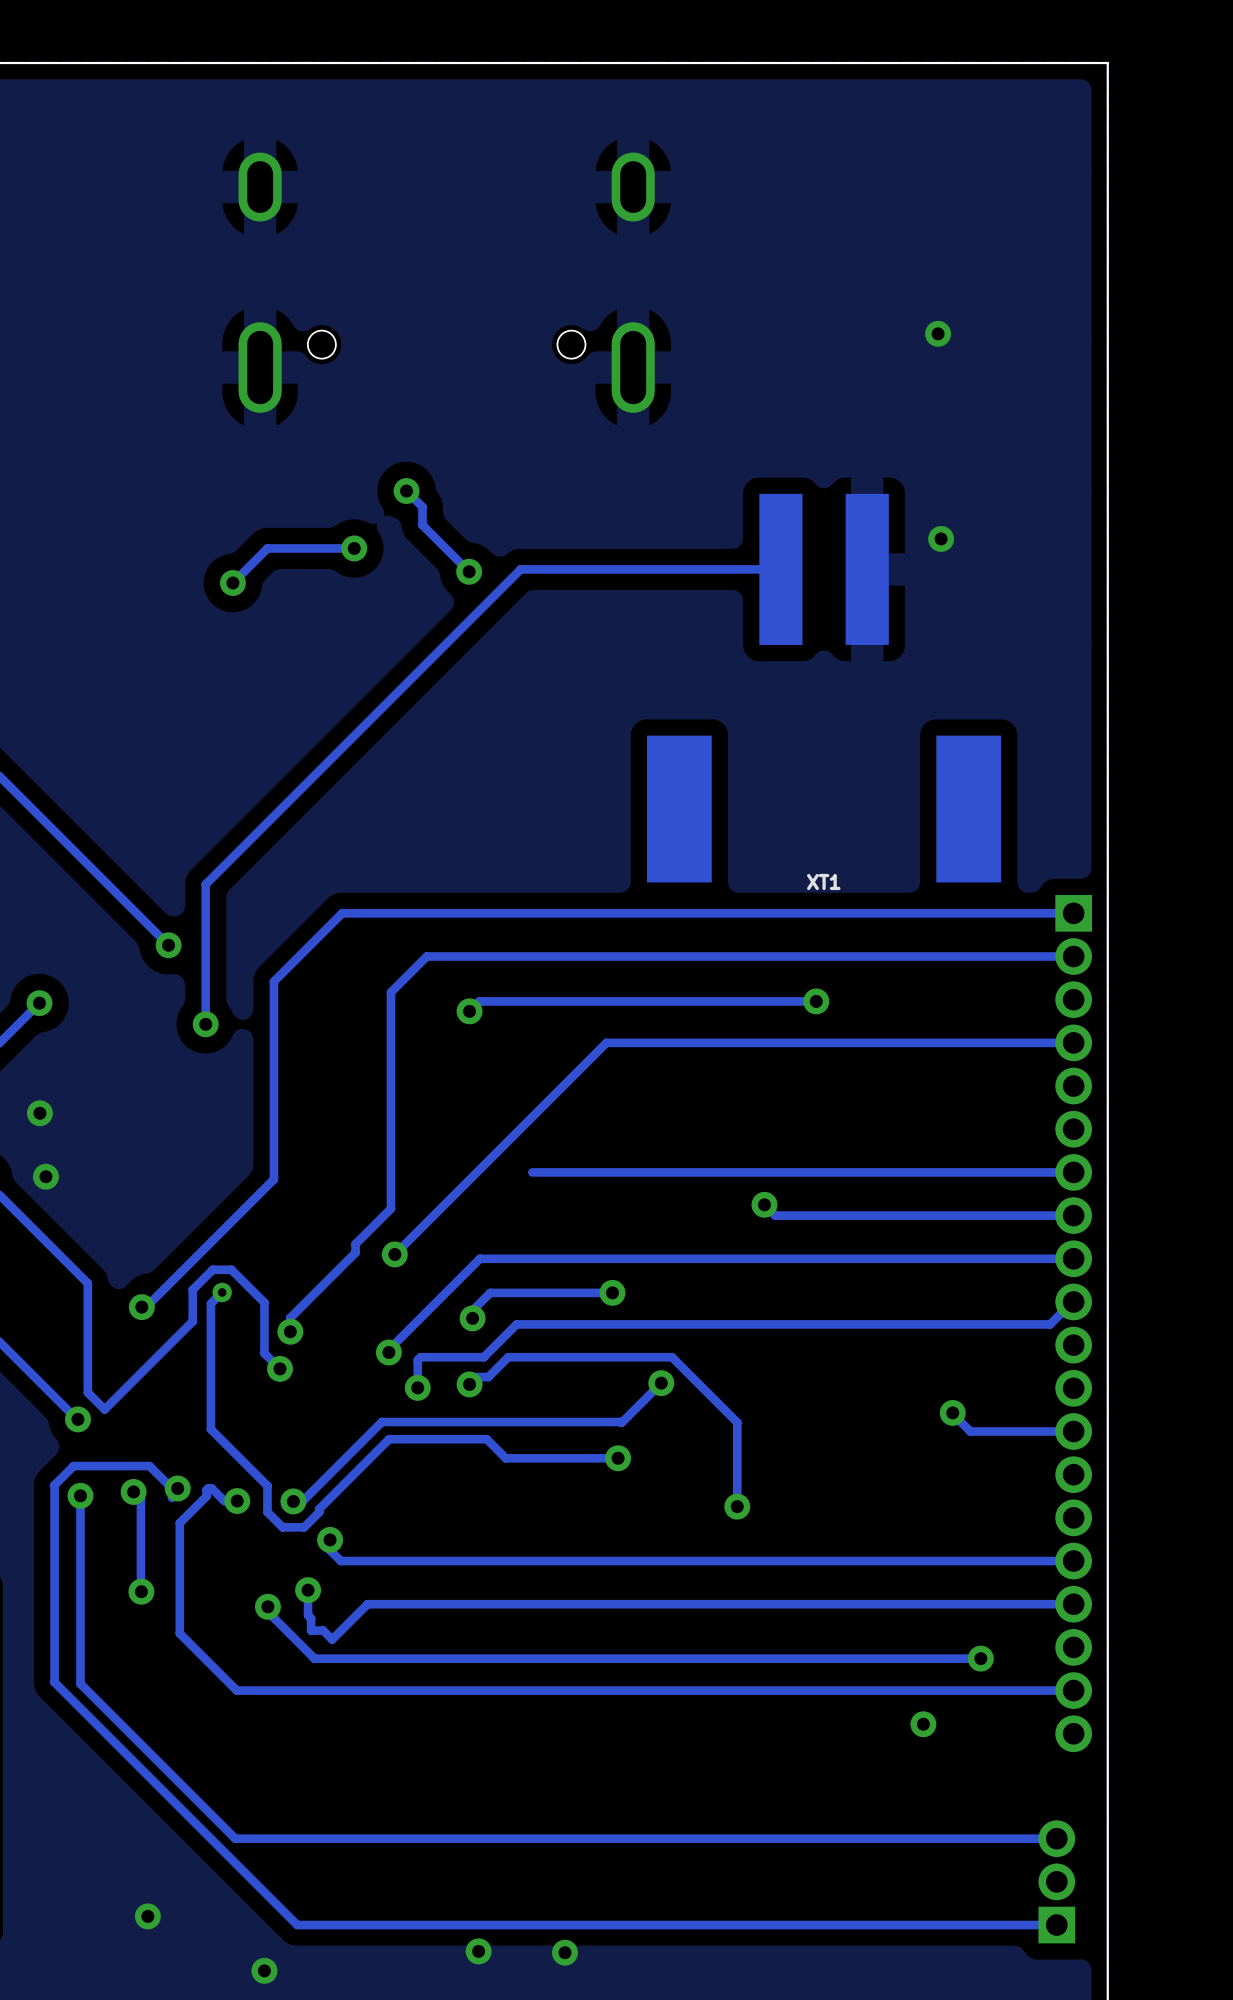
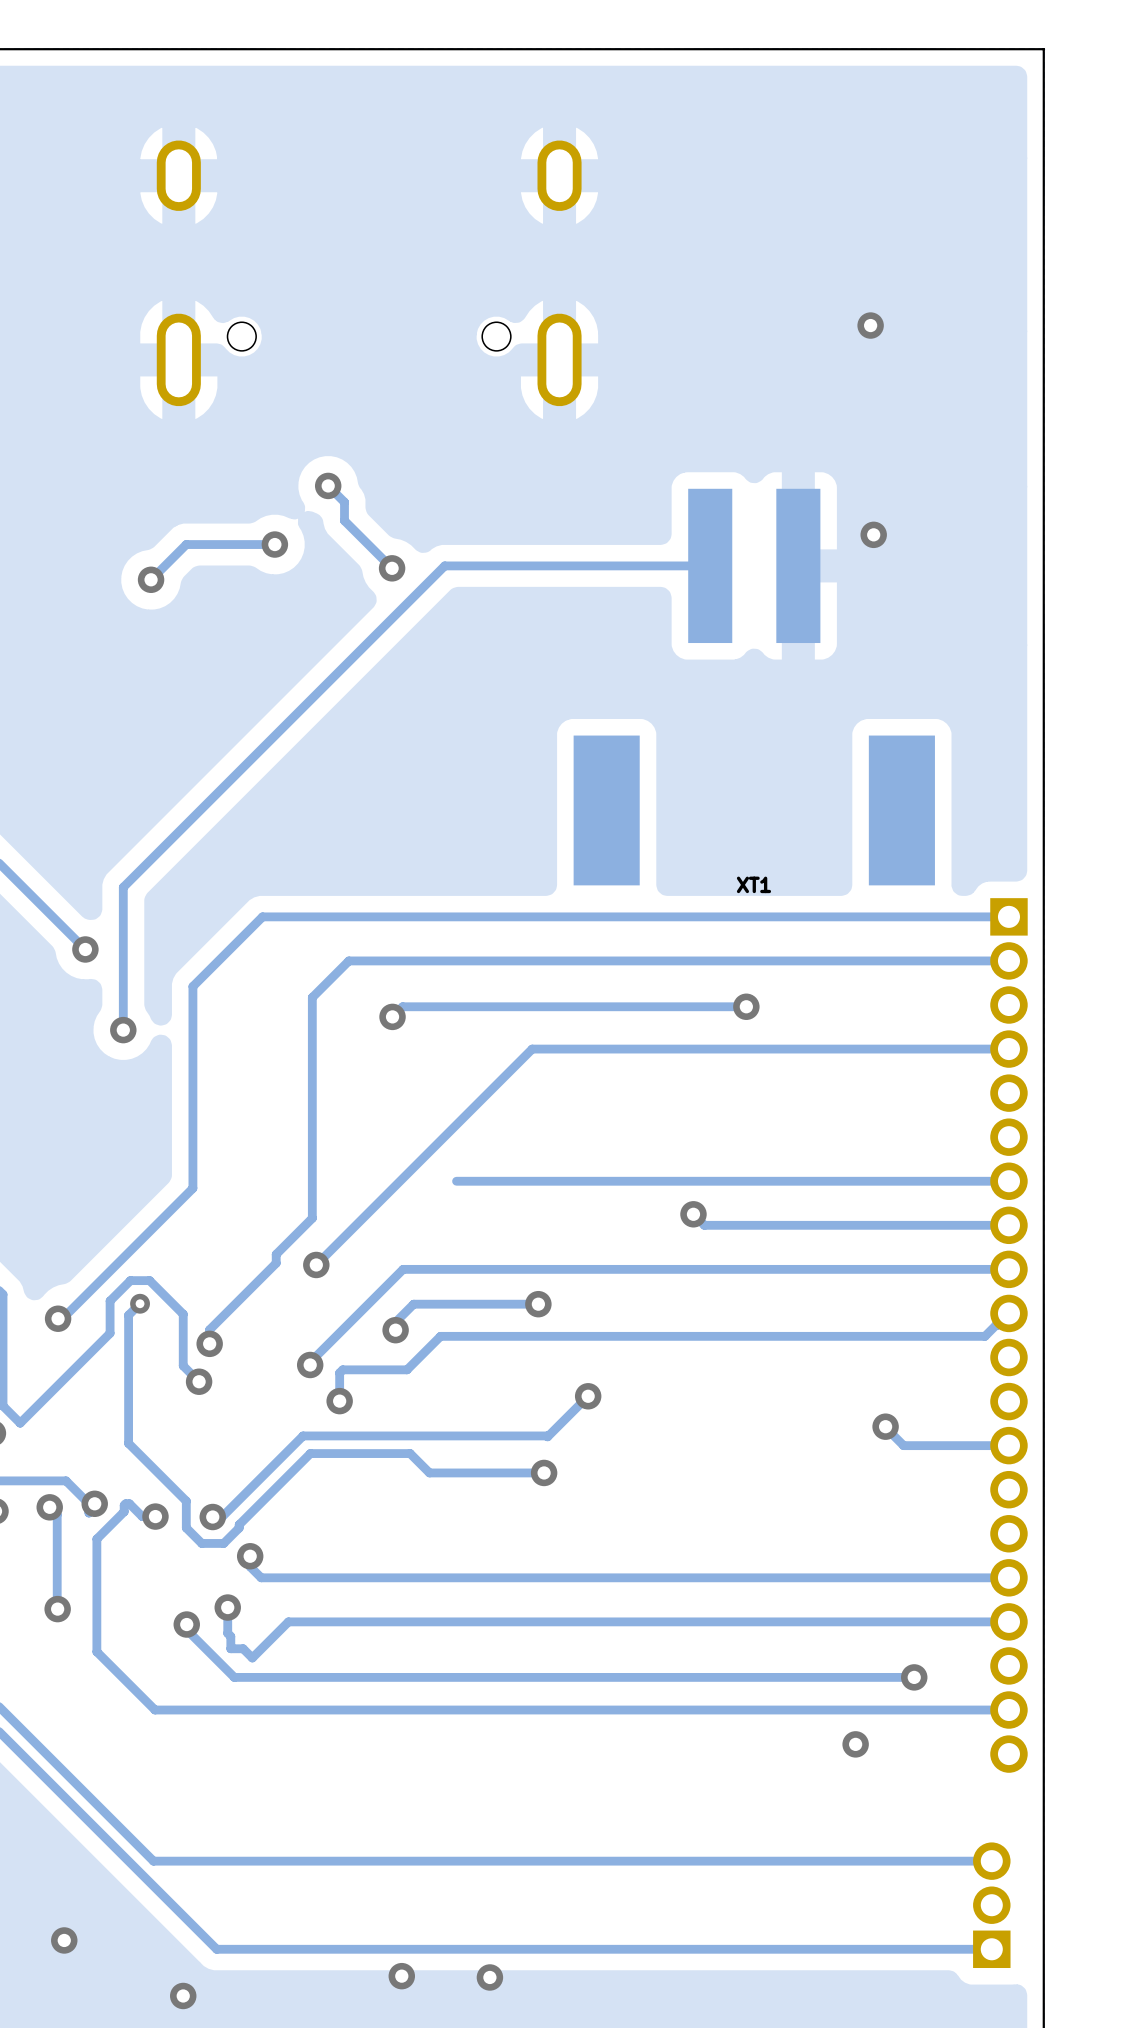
track: (469, 1384) (476, 1377) (488, 1377) (508, 1357) (672, 1357) (737, 1422) (737, 1506) -> none
via: (469, 1384) -> none
via: (737, 1506) -> none

